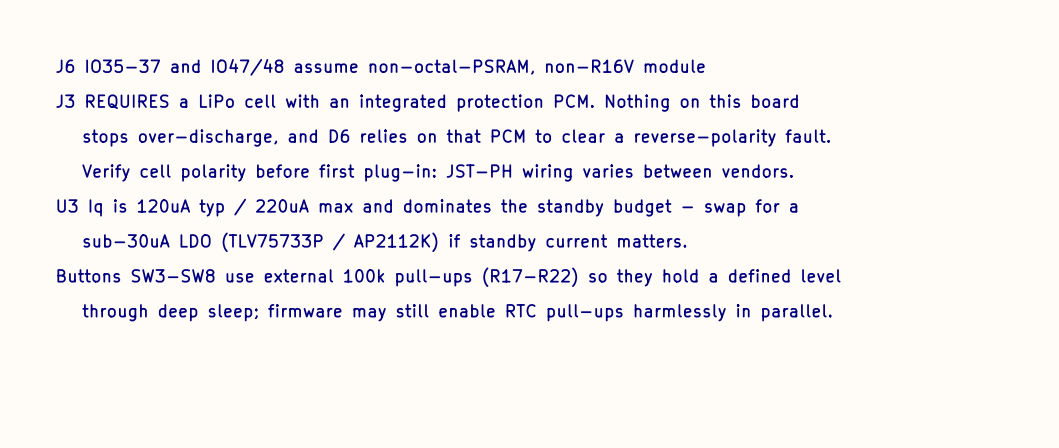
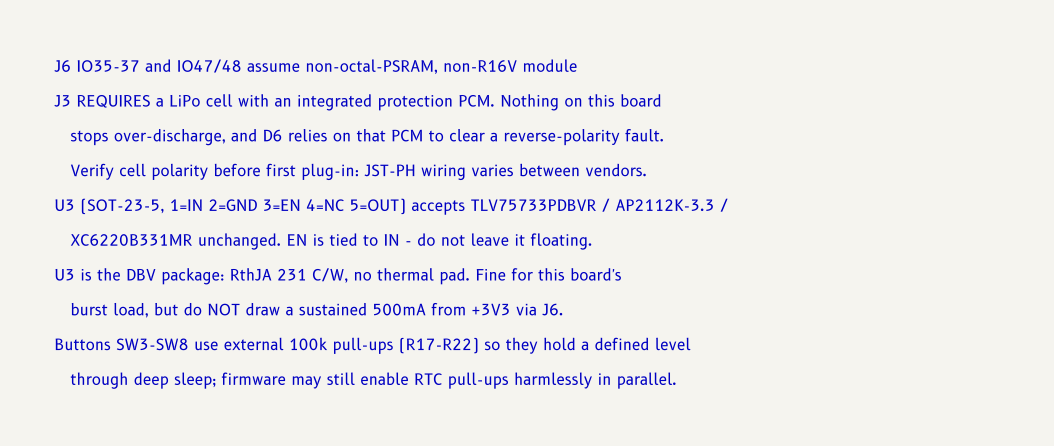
text: U3 Iq is 120uA typ / 220uA max and dominates the standby budget - swap for a (427, 207) -> U3 (SOT-23-5, 1=IN 2=GND 3=EN 4=NC 5=OUT) accepts TLV75733PDBVR / AP2112K-3.3 / (391, 206)
text: sub-30uA LDO (TLV75733P / AP2112K) if standby current matters. (384, 242) -> XC6220B331MR unchanged. EN is tied to IN - do not leave it floating. (331, 241)
text: Buttons SW3-SW8 use external 100k pull-ups (R17-R22) so they hold a defined level (448, 277) -> U3 is the DBV package: RthJA 231 C/W, no thermal pad. Fine for this board's (338, 276)
text: through deep sleep; firmware may still enable RTC pull-ups harmlessly in parallel. (457, 312) -> burst load, but do NOT draw a sustained 500mA from +3V3 via J6. (317, 310)
text: none -> Buttons SW3-SW8 use external 100k pull-ups (R17-R22) so they hold a defined level (373, 345)
text: none -> through deep sleep; firmware may still enable RTC pull-ups harmlessly in parallel. (373, 380)

